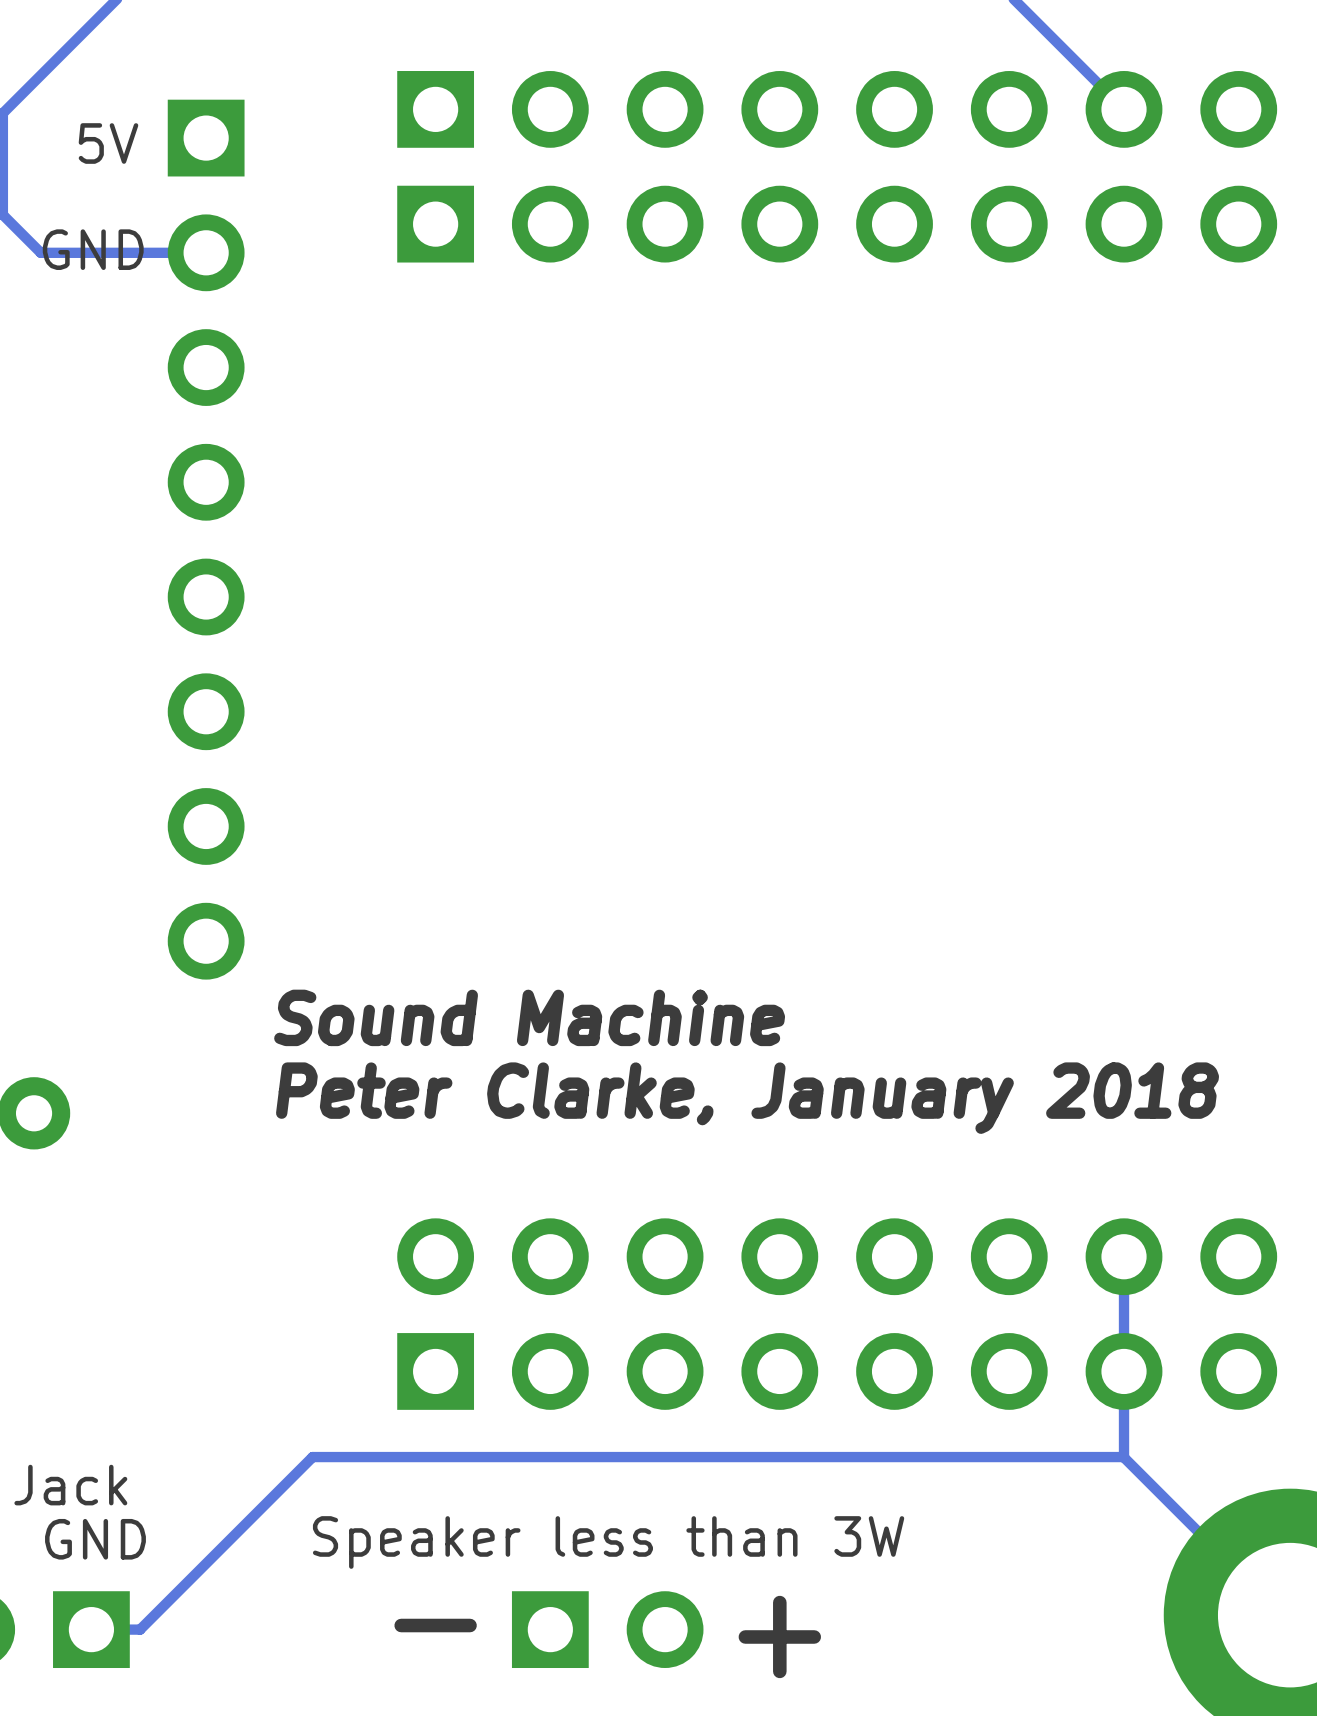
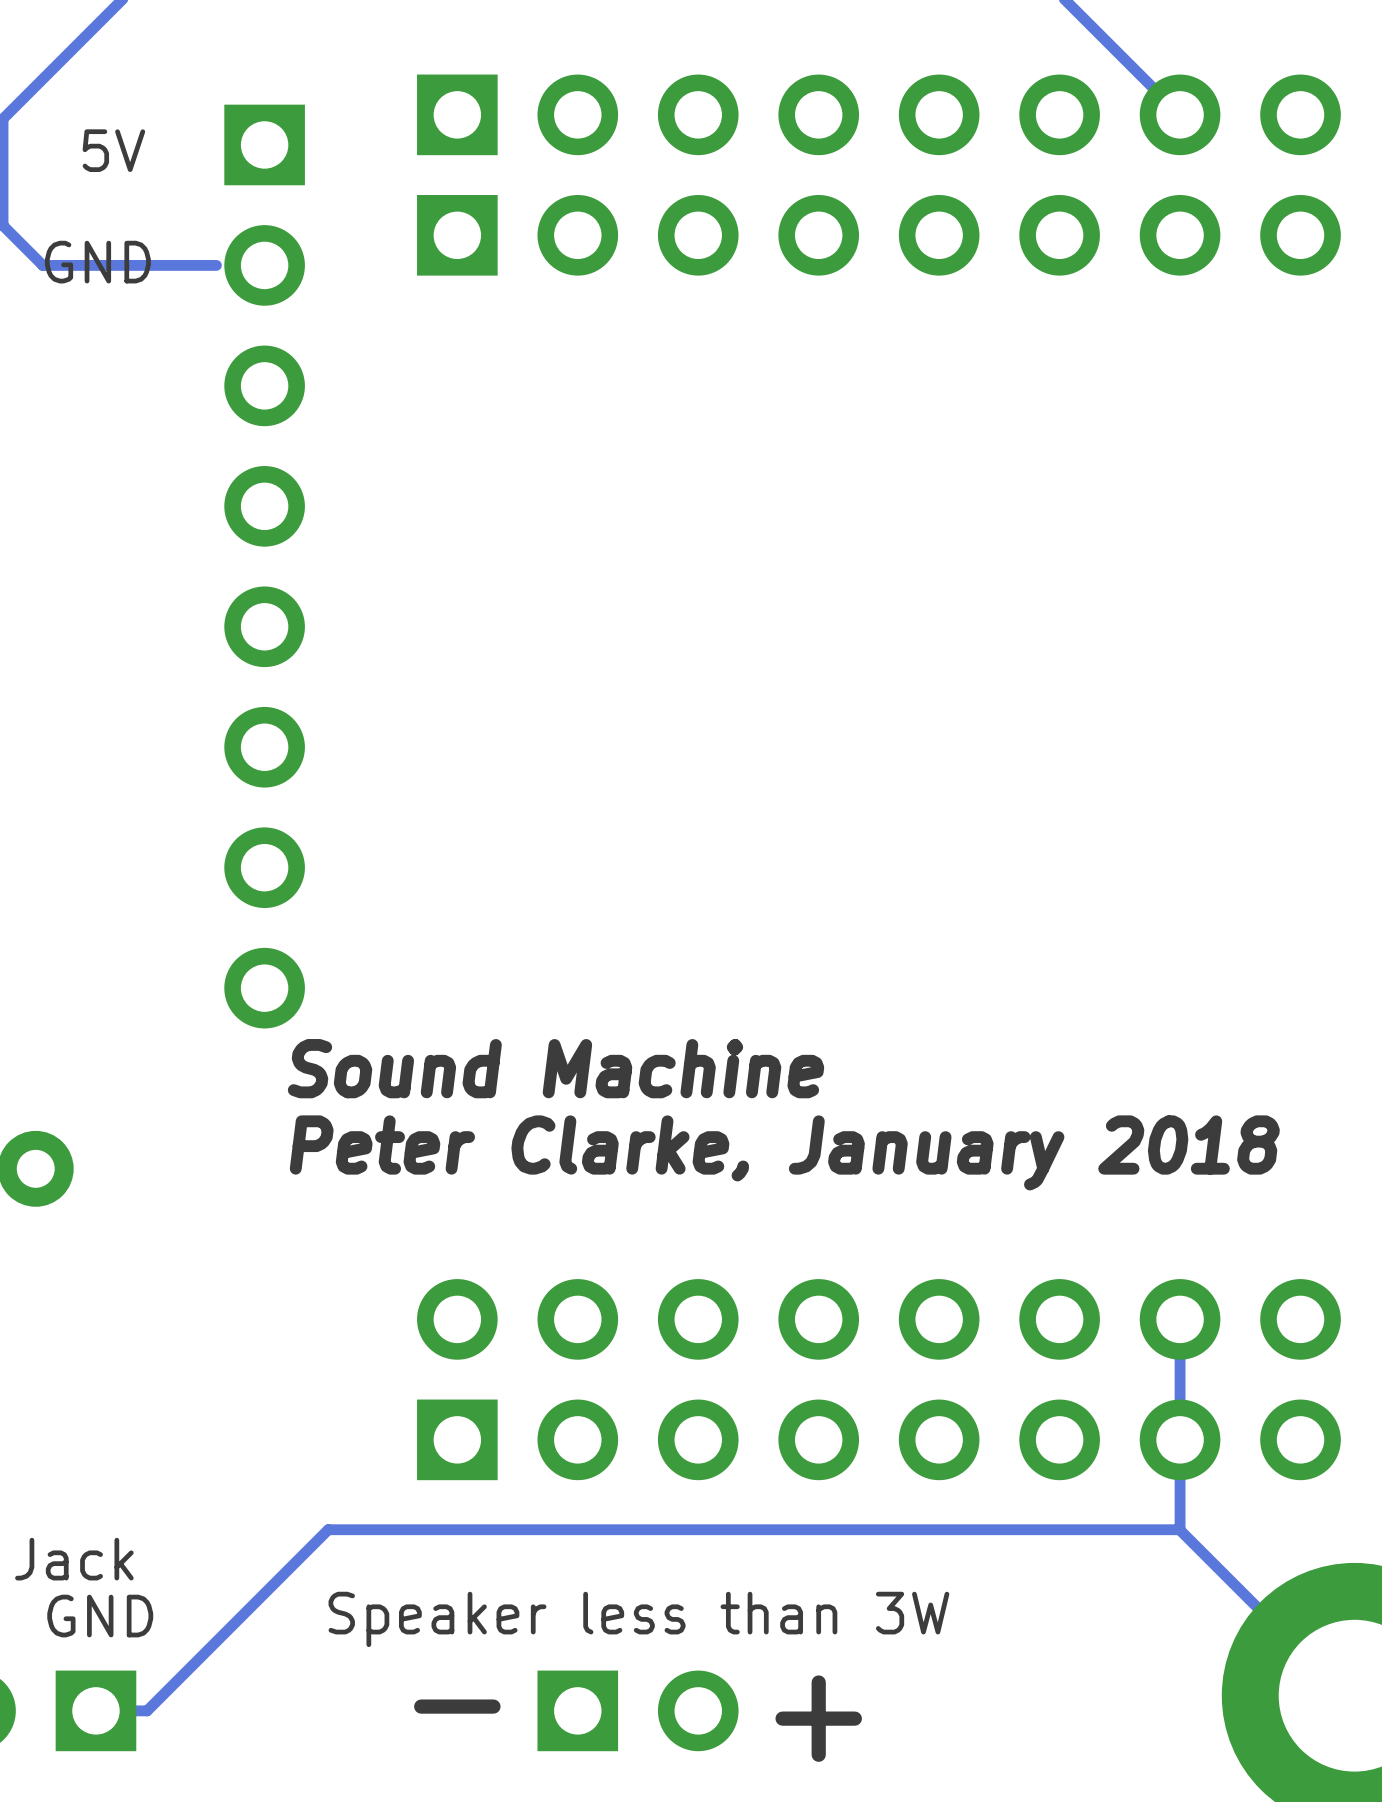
part position: (206, 539) -> (264, 566)

